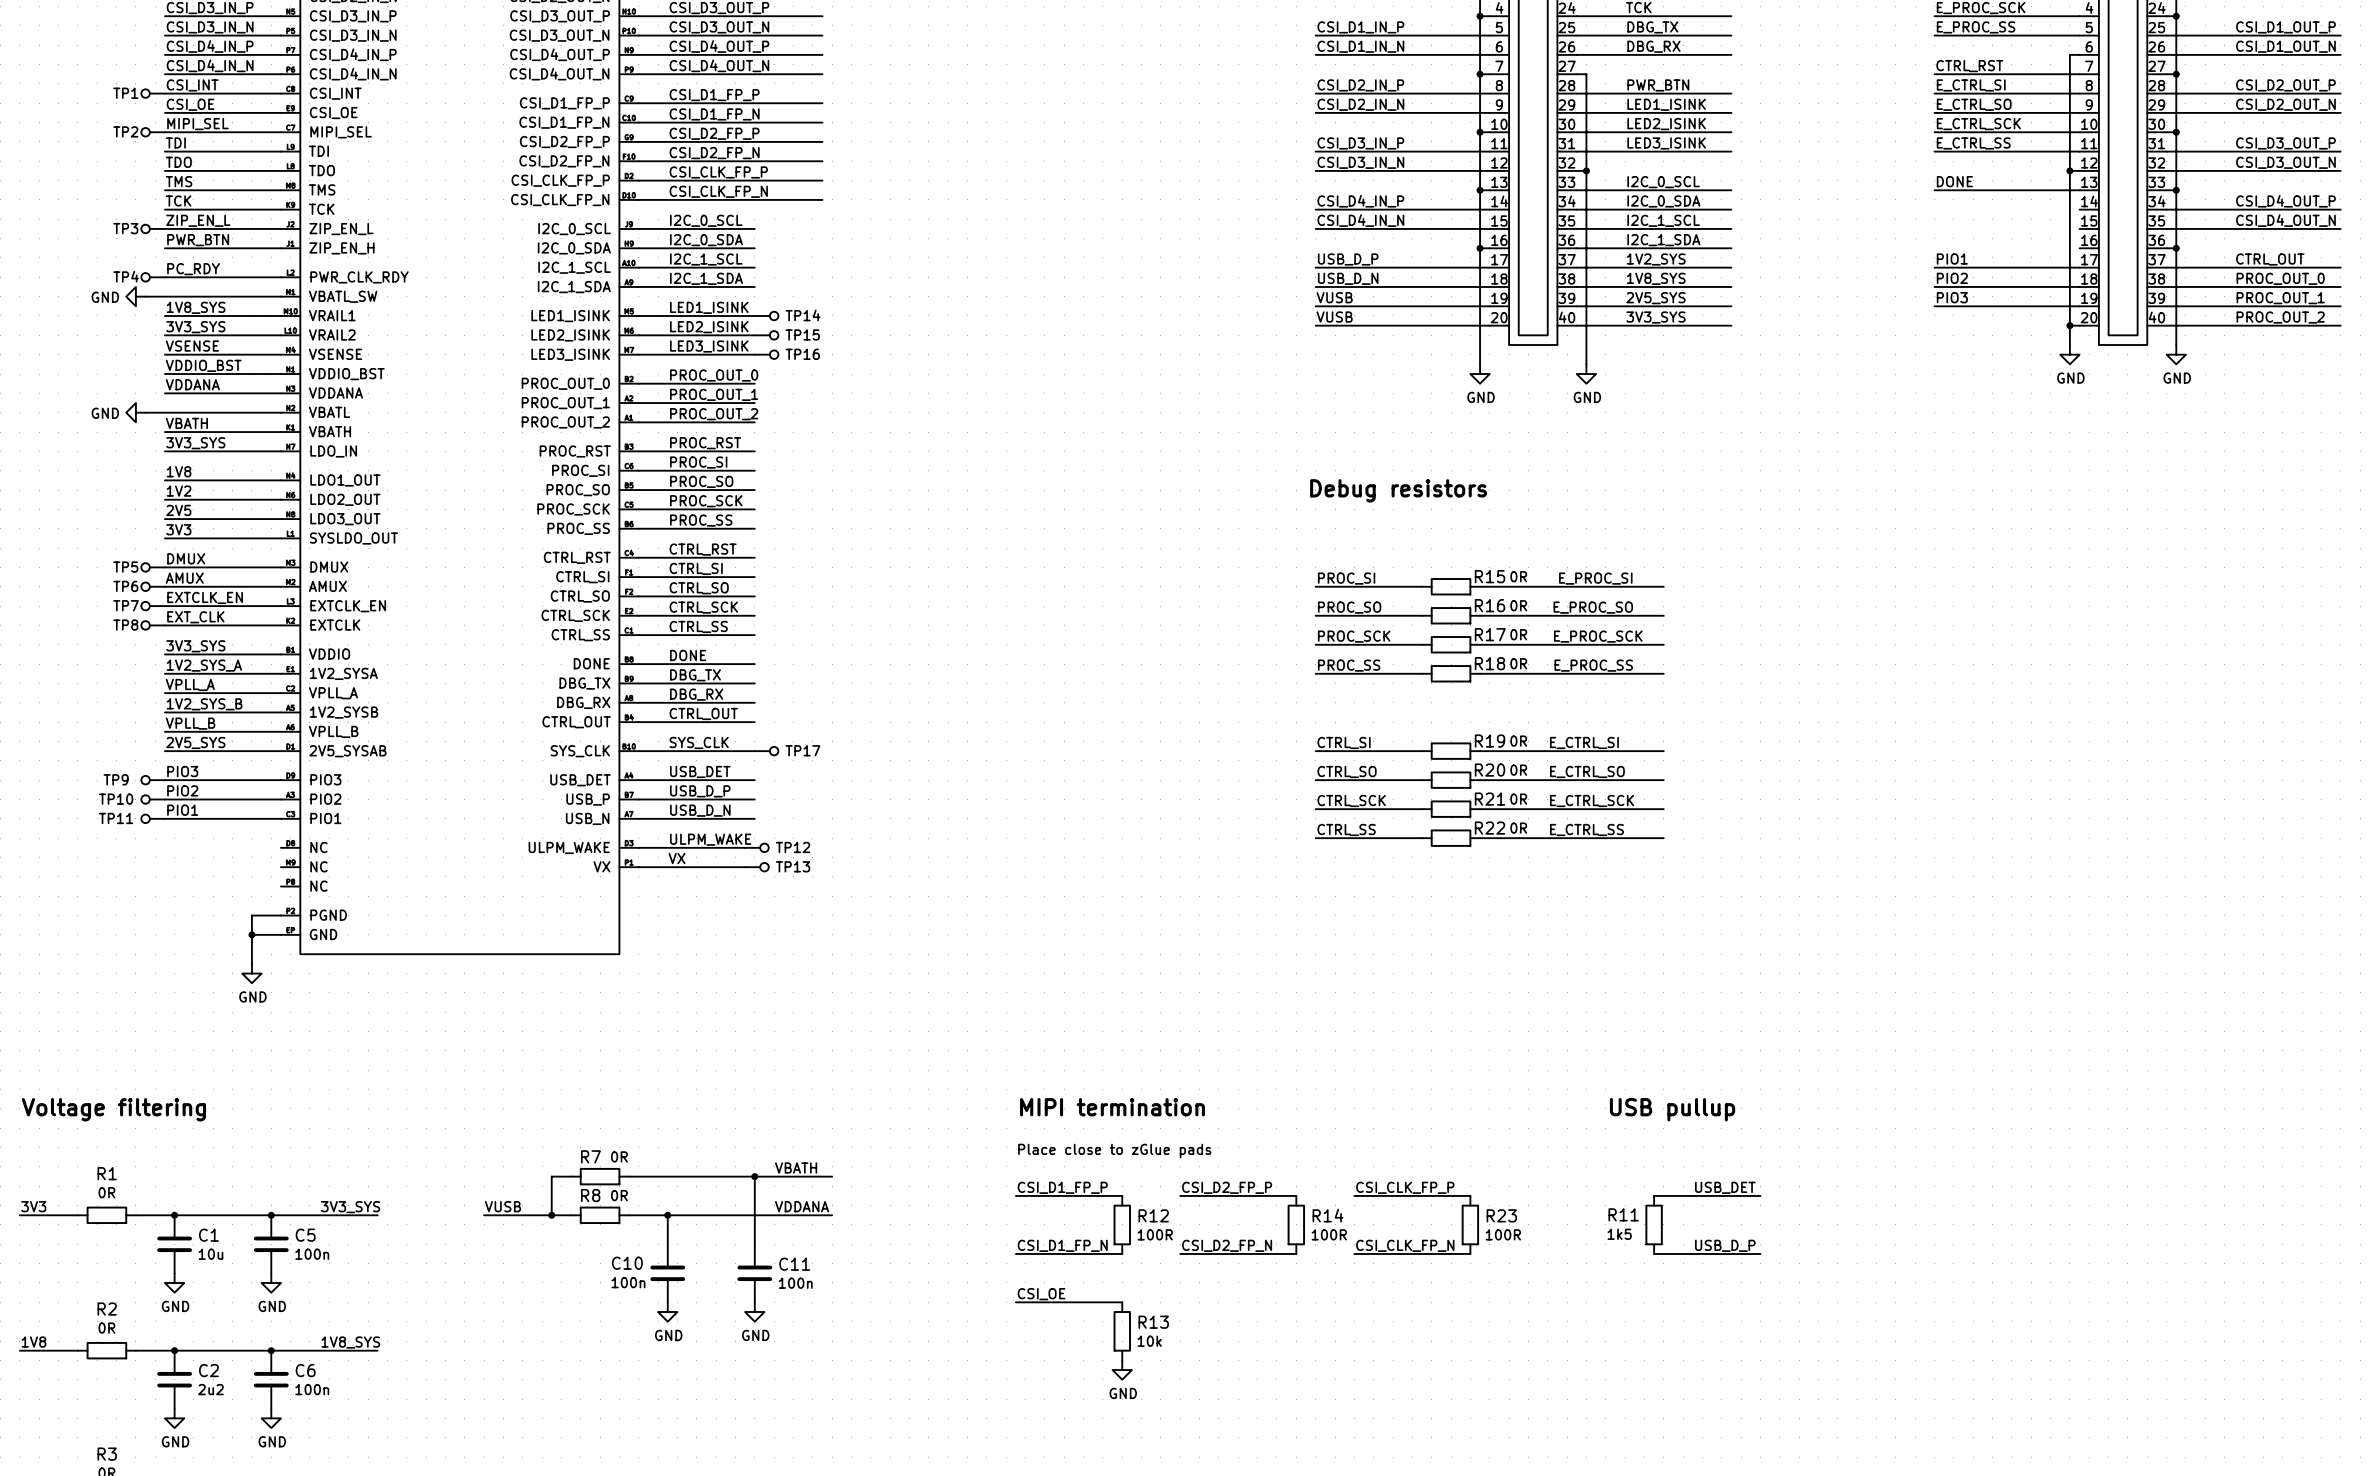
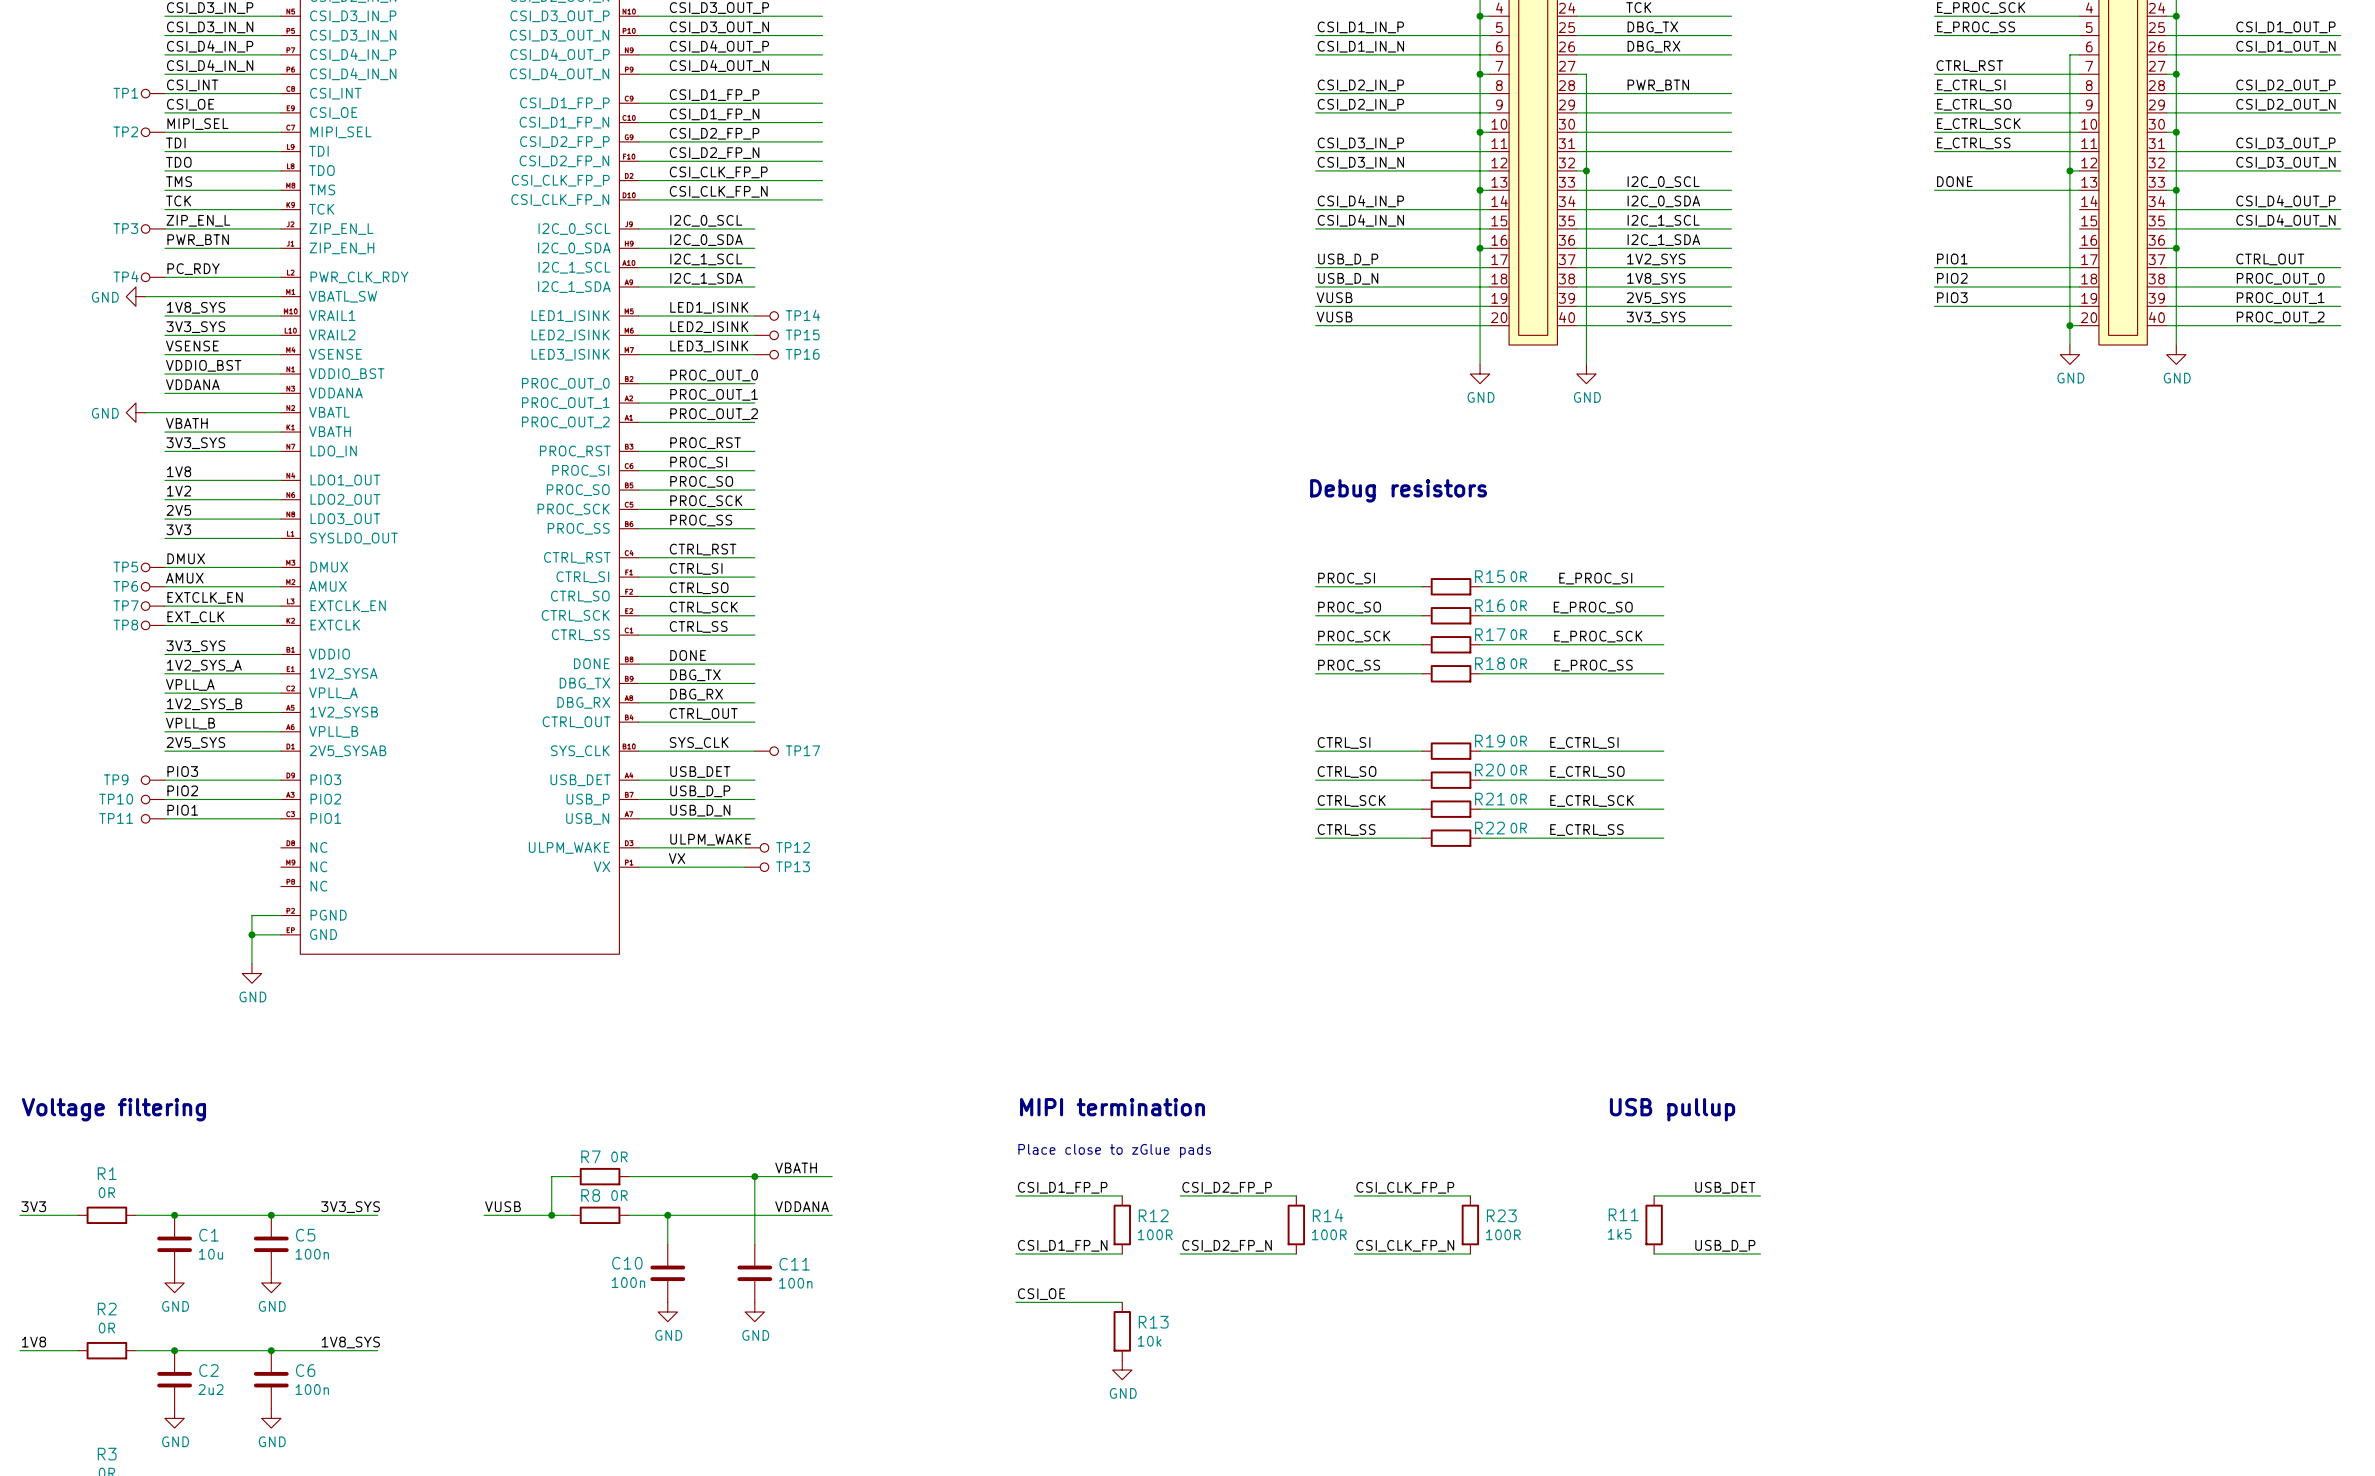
label: CSI_D2_IN_N (1360, 104) -> CSI_D2_IN_P (1360, 104)
label: LED1_ISINK (1666, 104) -> none
label: LED2_ISINK (1666, 124) -> none
label: LED3_ISINK (1666, 143) -> none

